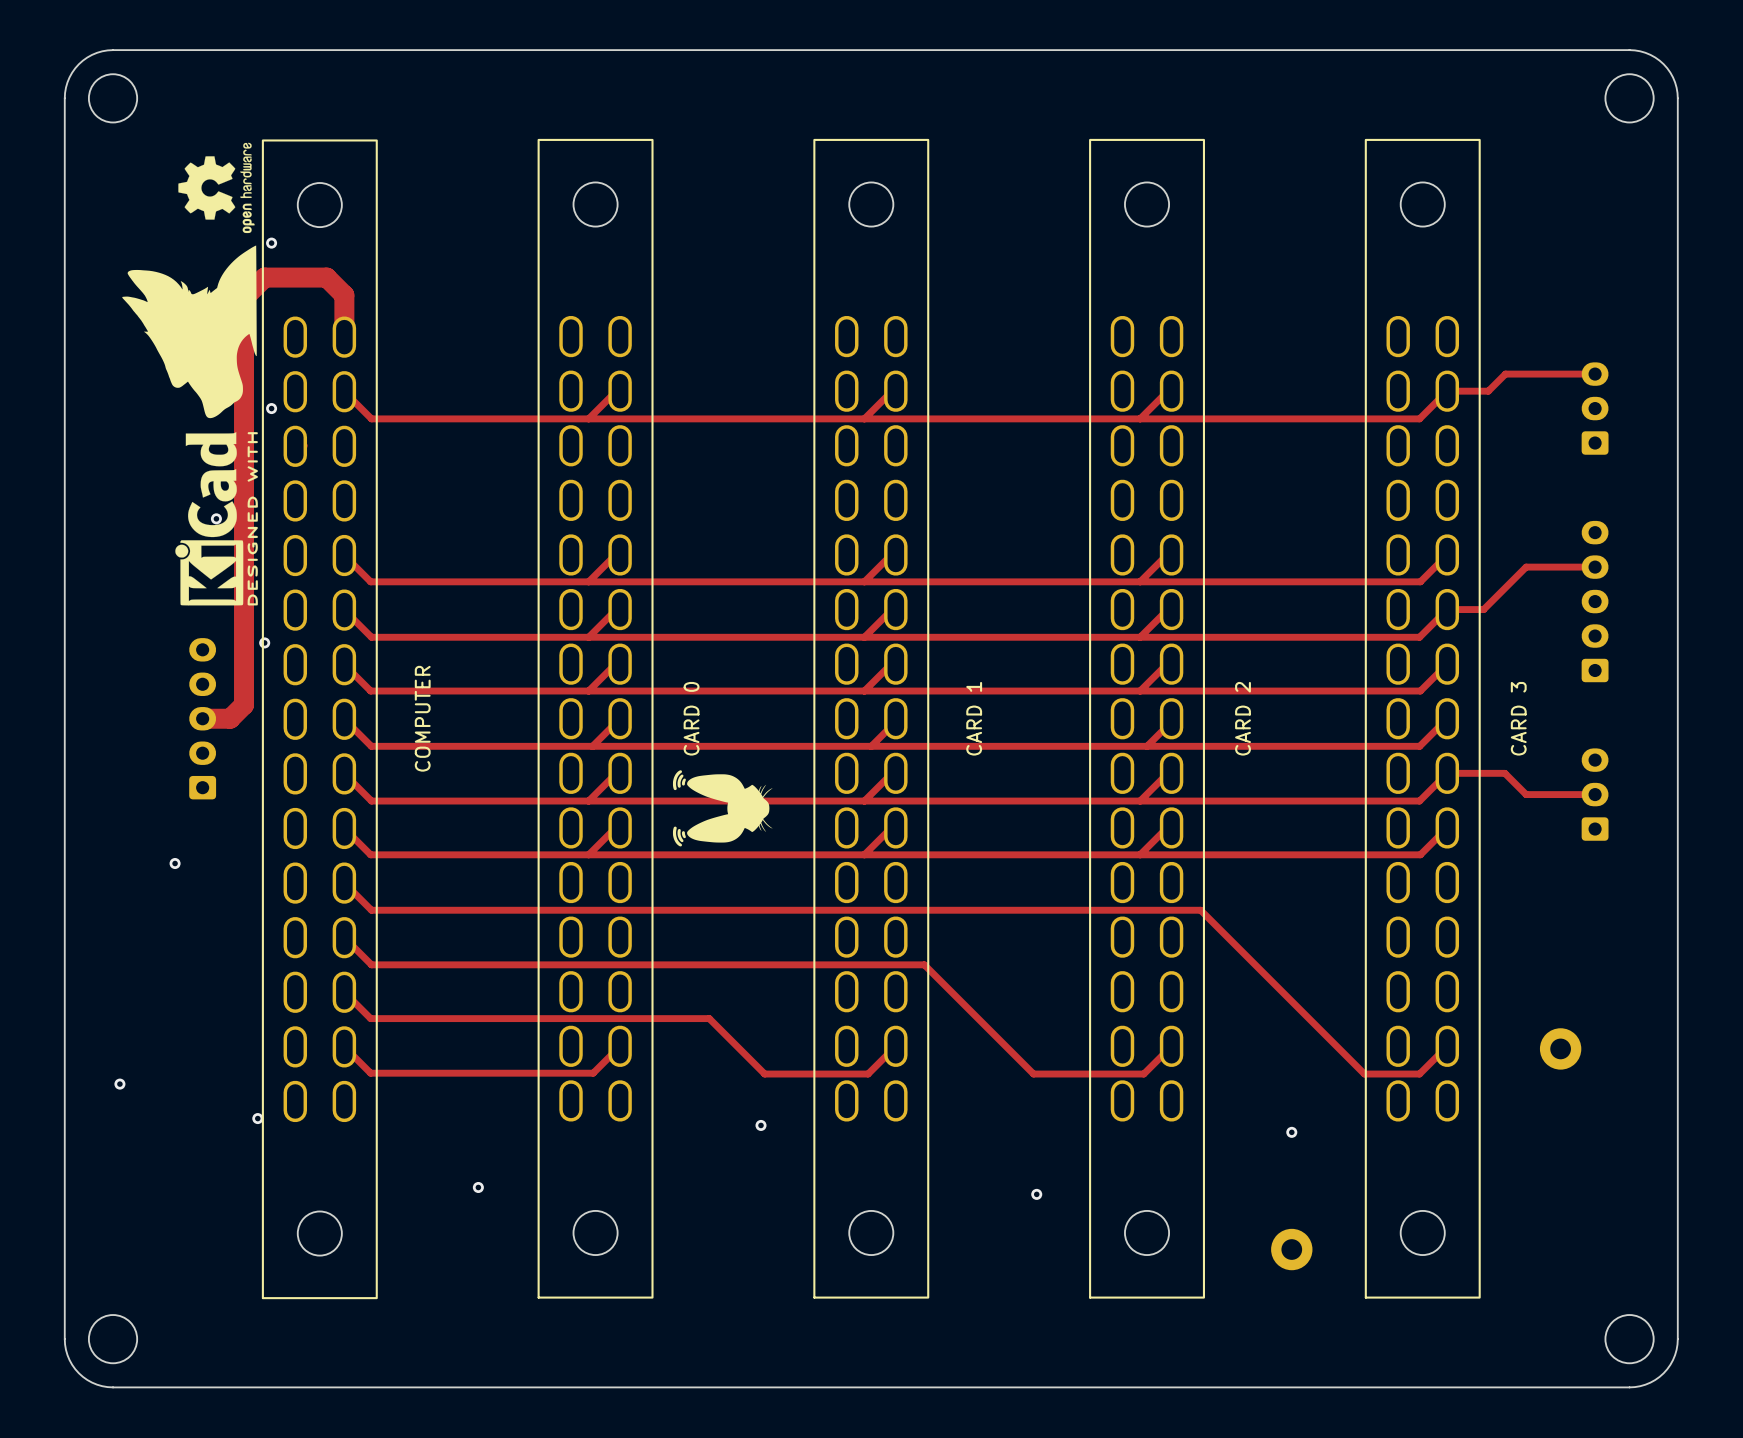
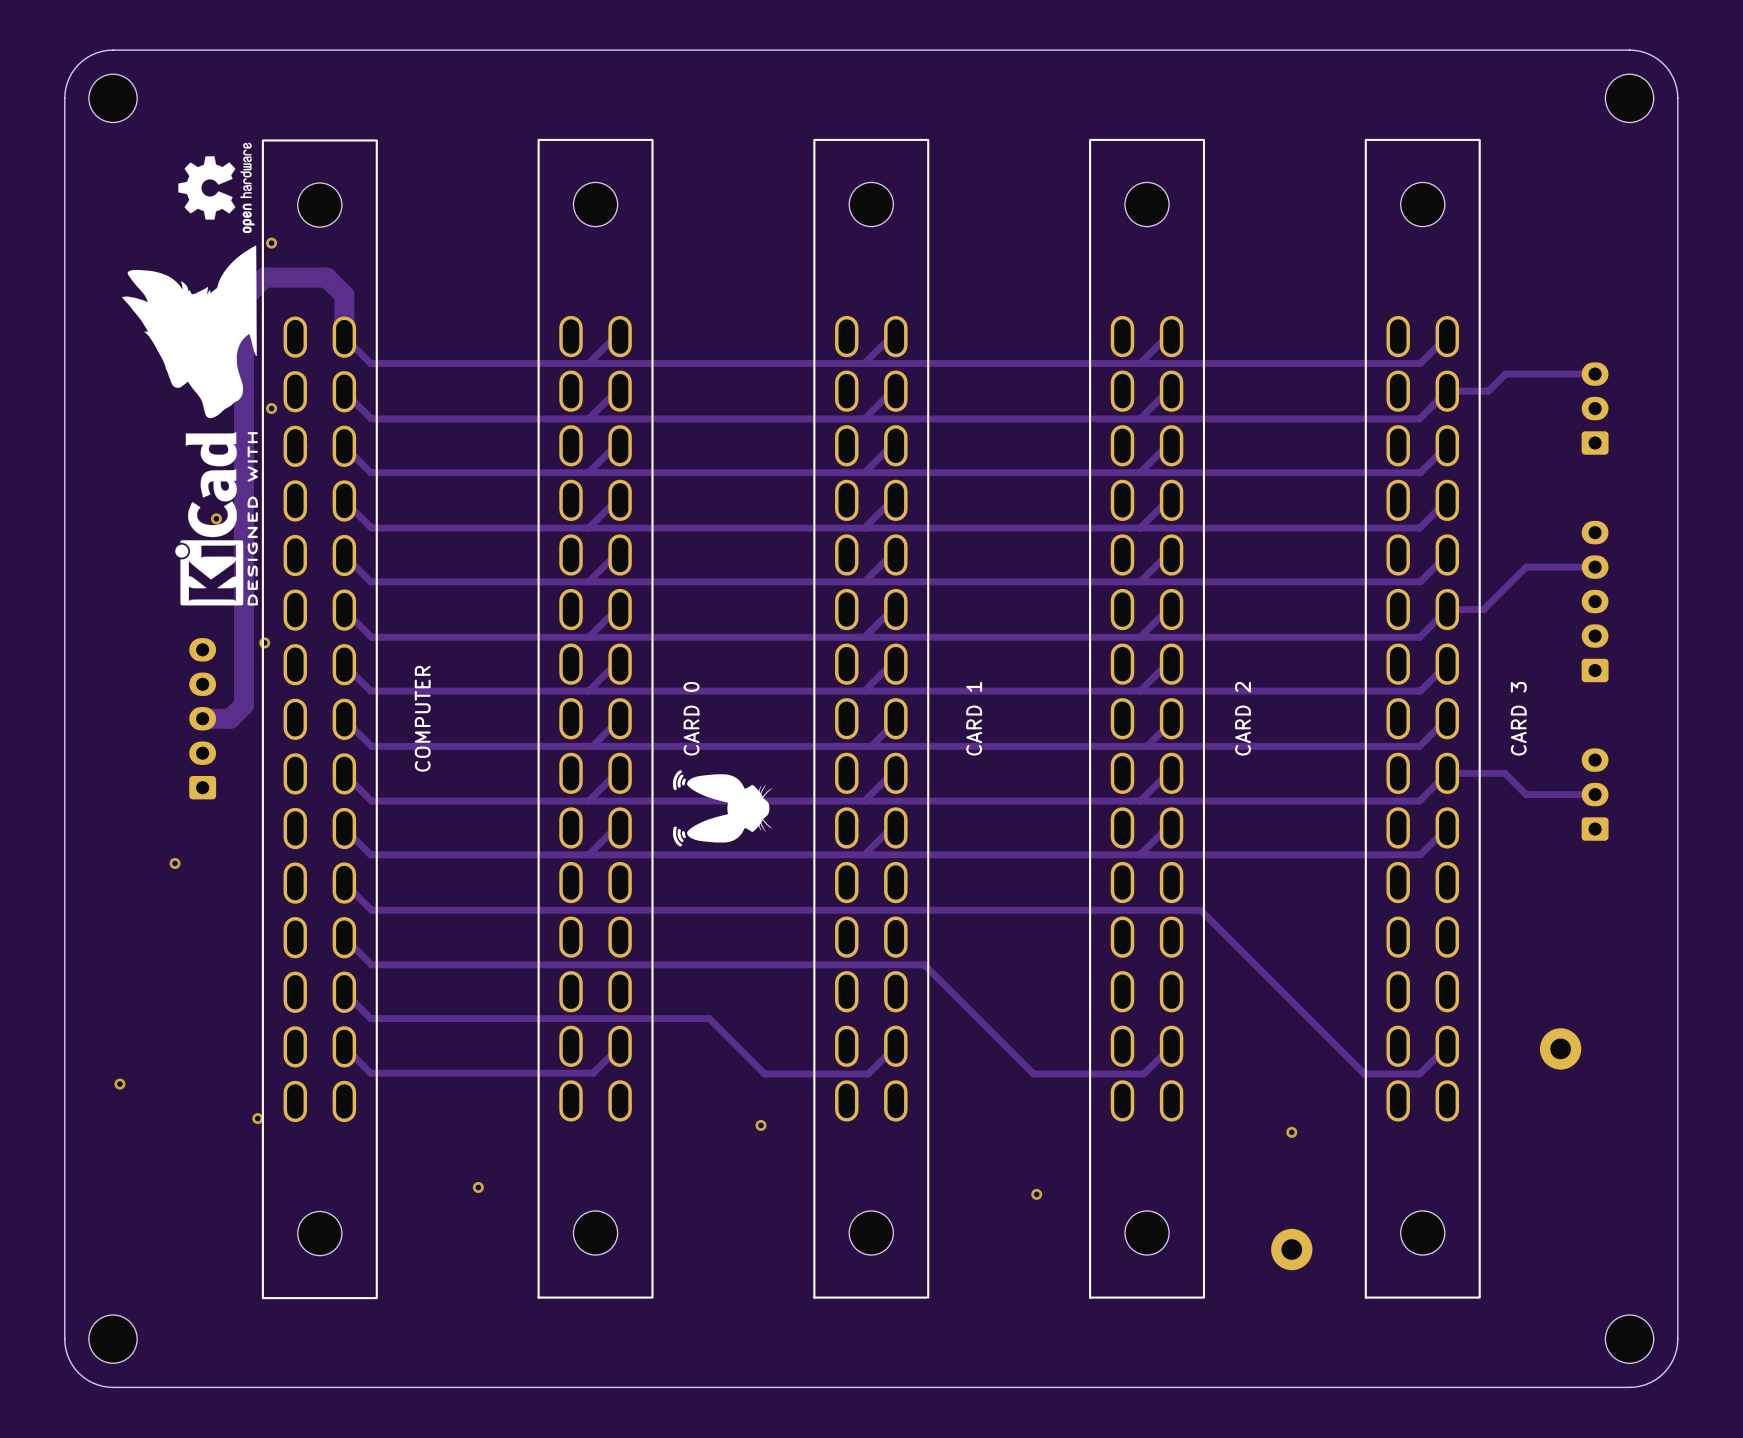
track: none -> (620, 336) (615, 336) (588, 363)
track: none -> (895, 336) (891, 336) (864, 363)
track: none -> (1171, 336) (1167, 336) (1140, 363)
track: none -> (1447, 336) (1420, 363) (370, 363) (344, 337)
track: none -> (620, 445) (615, 445) (588, 472)
track: none -> (895, 445) (891, 445) (864, 472)
track: none -> (1171, 445) (1167, 445) (1140, 472)
track: none -> (1447, 445) (1420, 472) (370, 472) (344, 446)
track: none -> (620, 500) (616, 500) (588, 528)
track: none -> (895, 500) (892, 500) (864, 528)
track: none -> (1171, 500) (1167, 500) (1140, 528)
track: none -> (1447, 500) (1419, 528) (371, 528) (344, 500)

